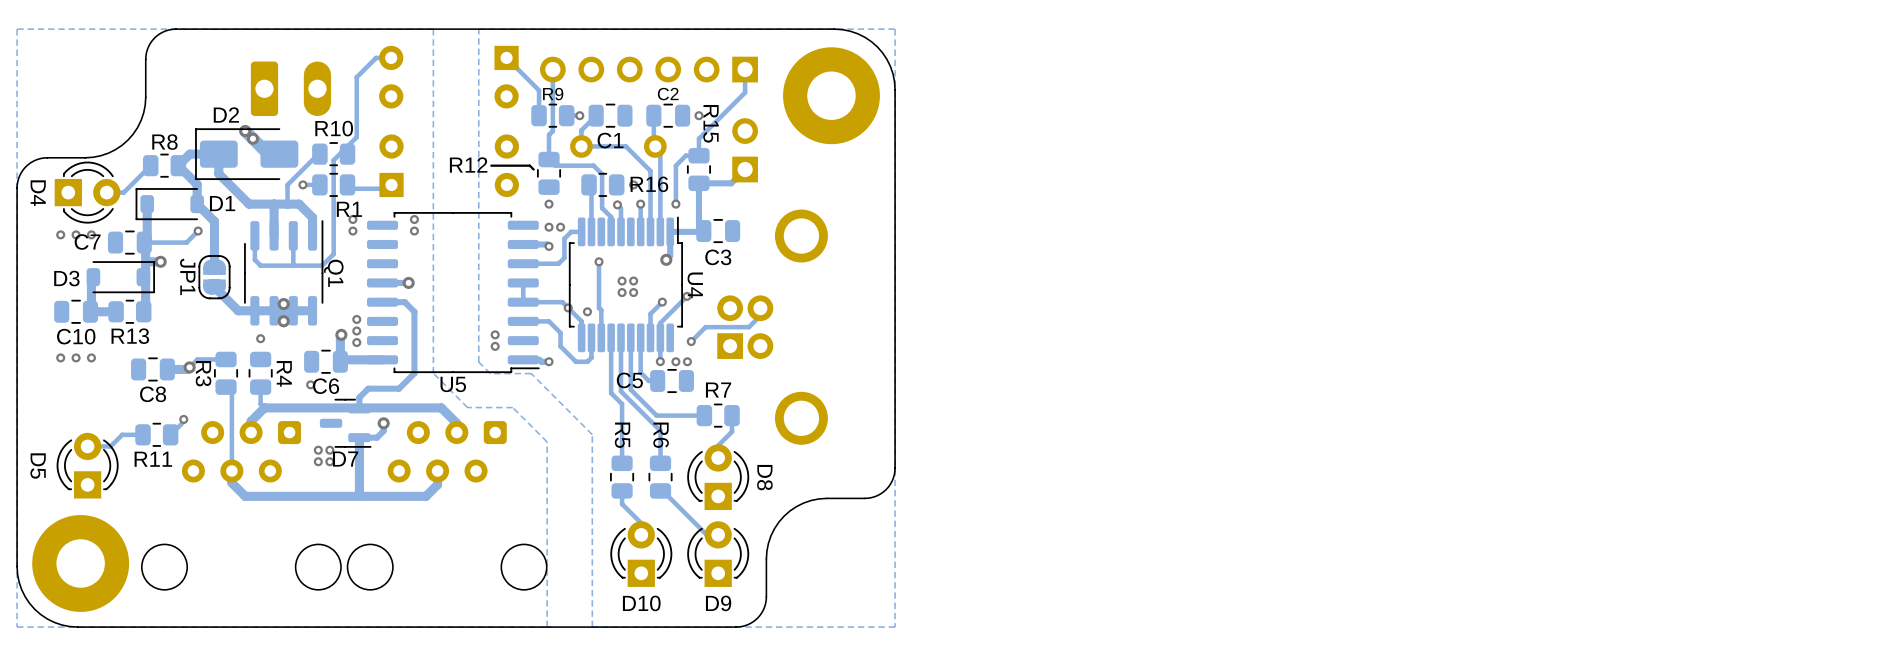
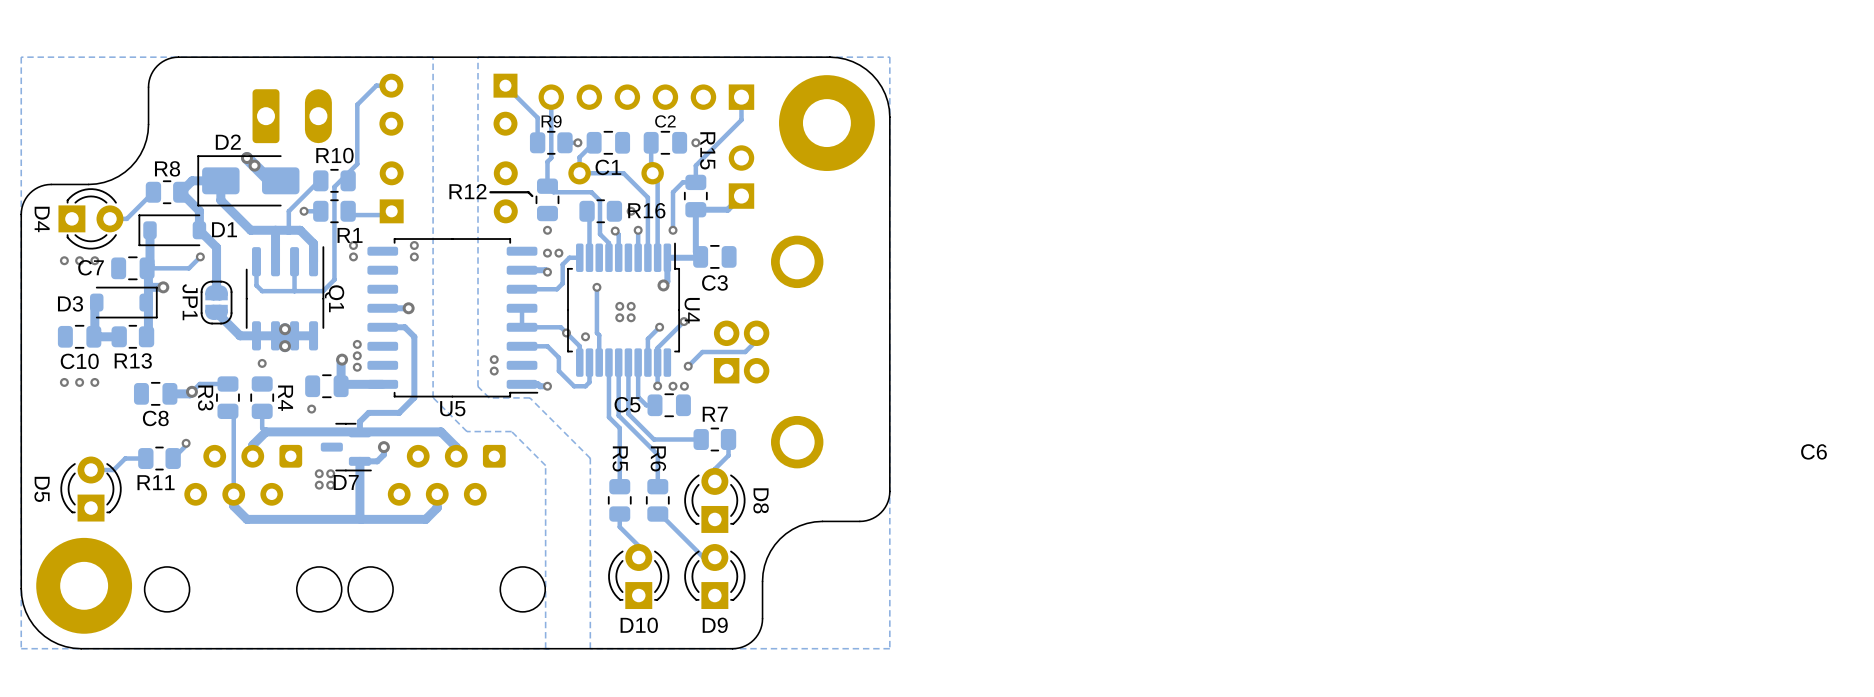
C6 name position: C6 (326, 386) -> C6 (1813, 451)

